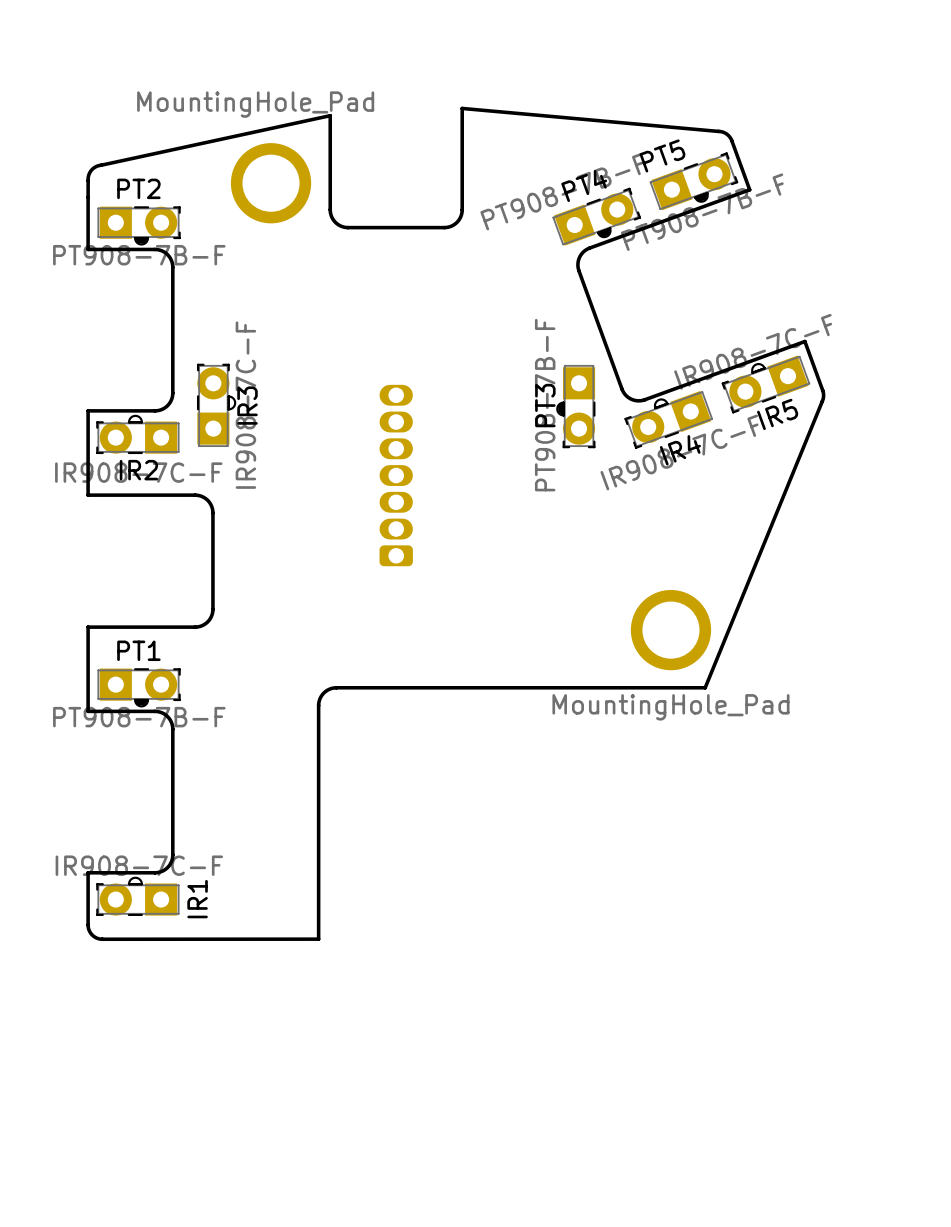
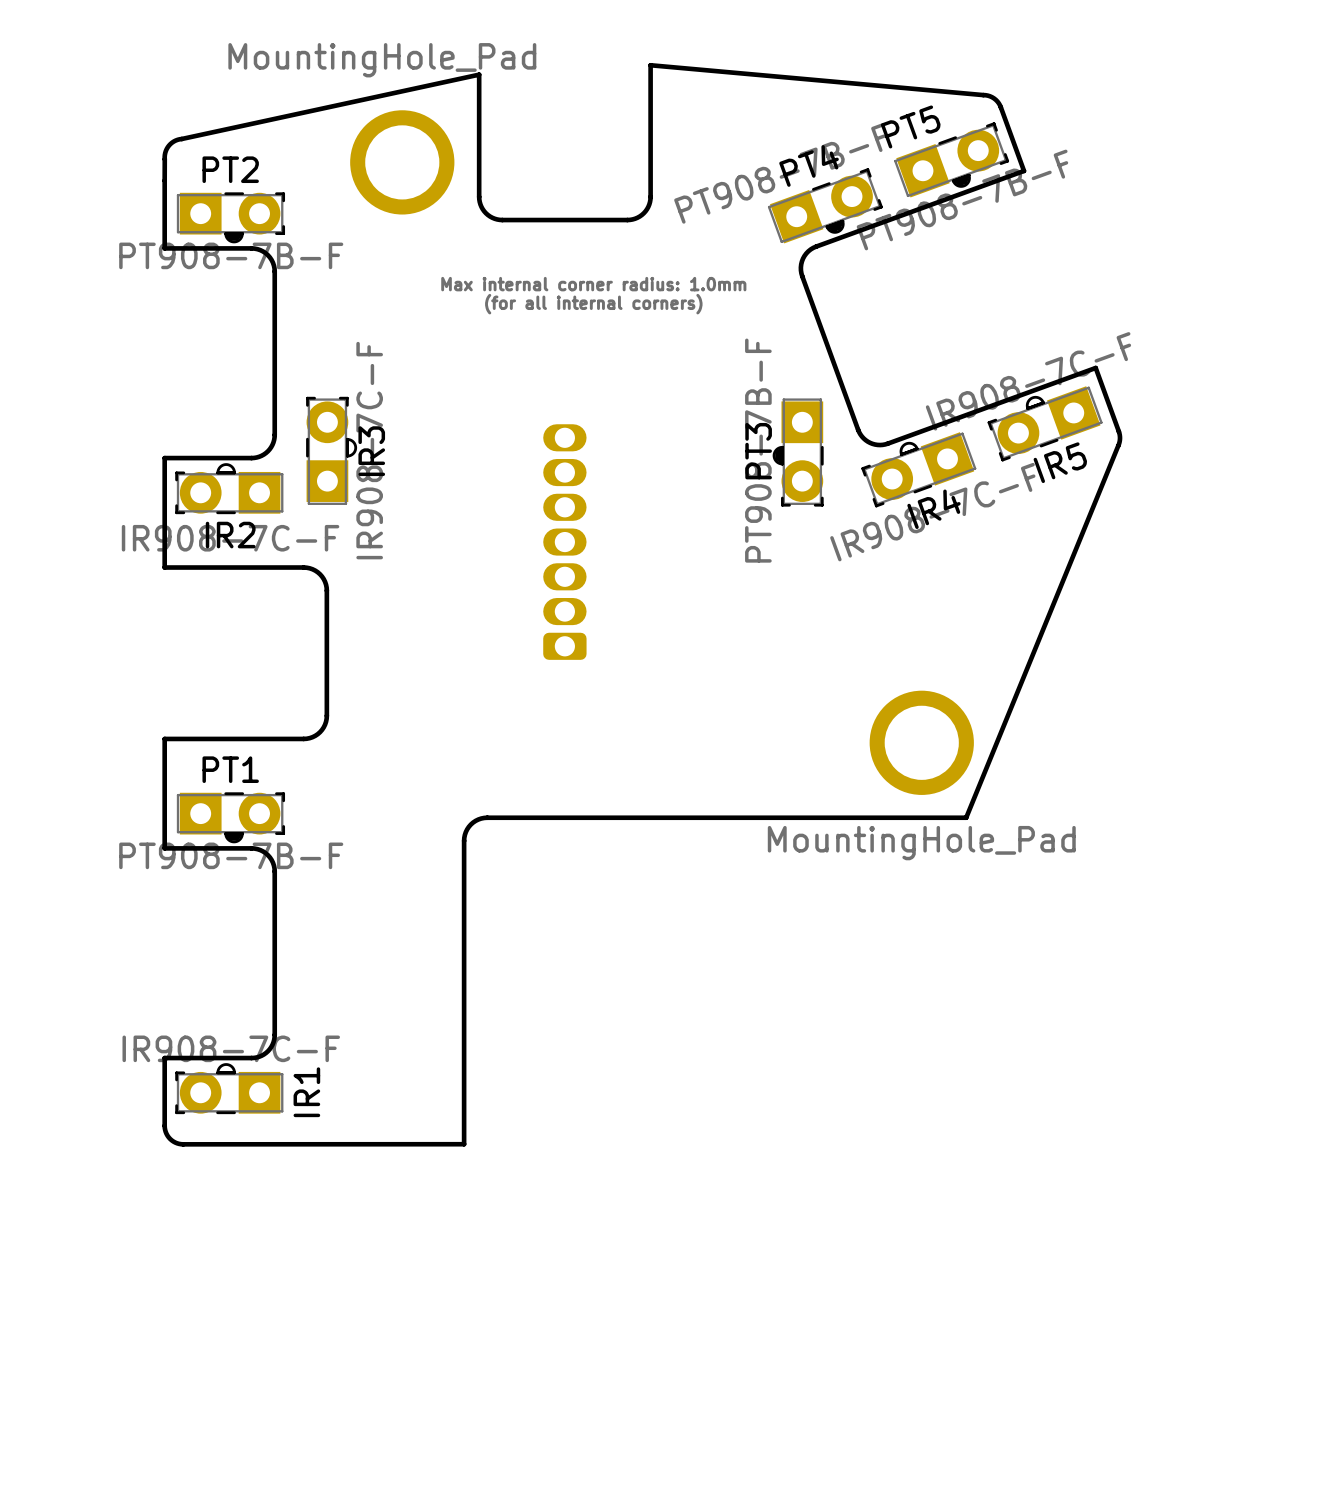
text: none -> Max internal corner radius: 1.0mm (593, 284)
text: none -> (for all internal corners) (593, 304)

